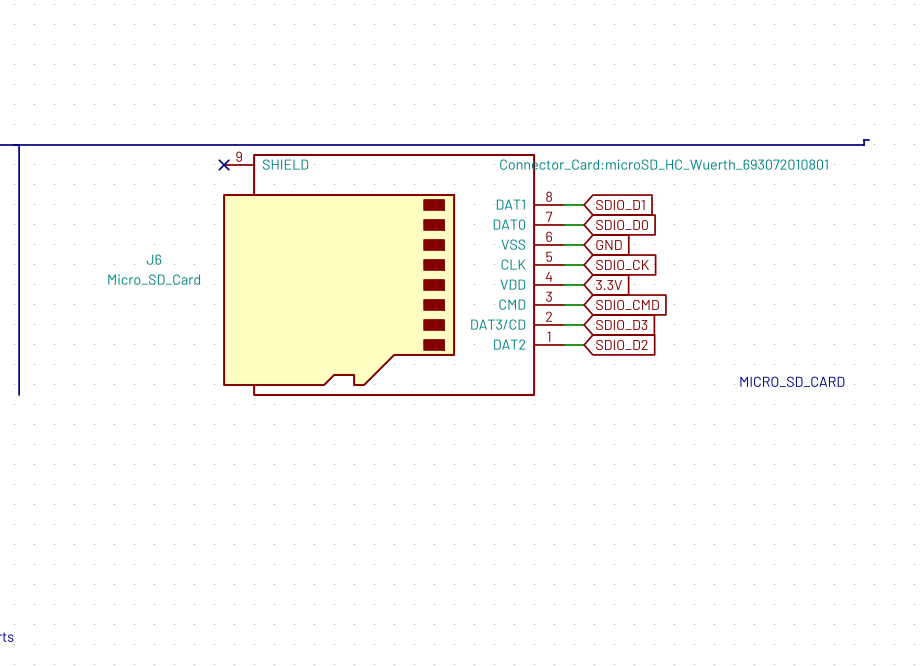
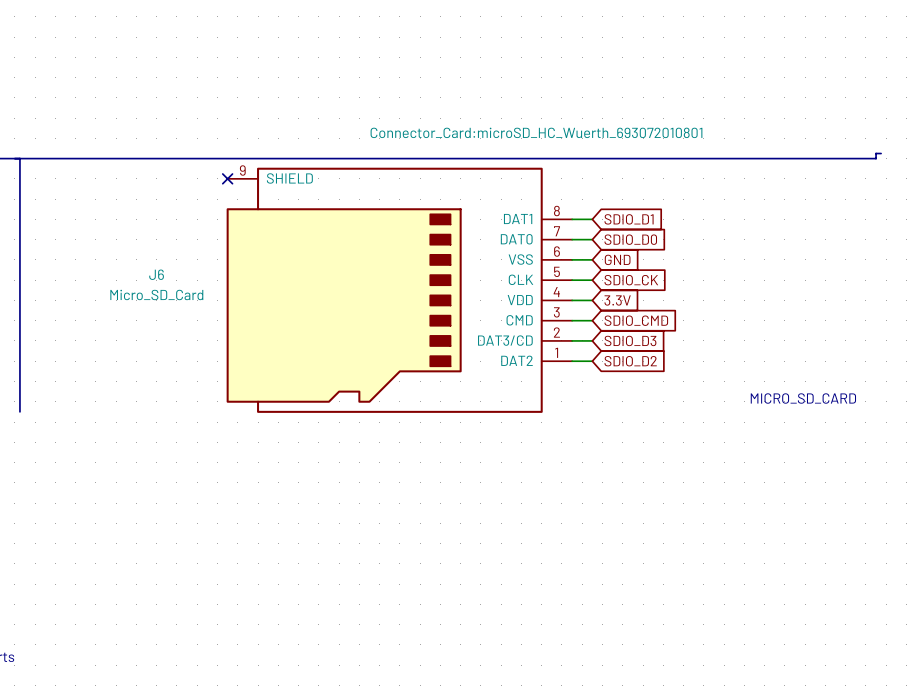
J6 text position: Connector_Card:microSD_HC_Wuerth_693072010801 (663, 164) -> Connector_Card:microSD_HC_Wuerth_693072010801 (536, 132)

